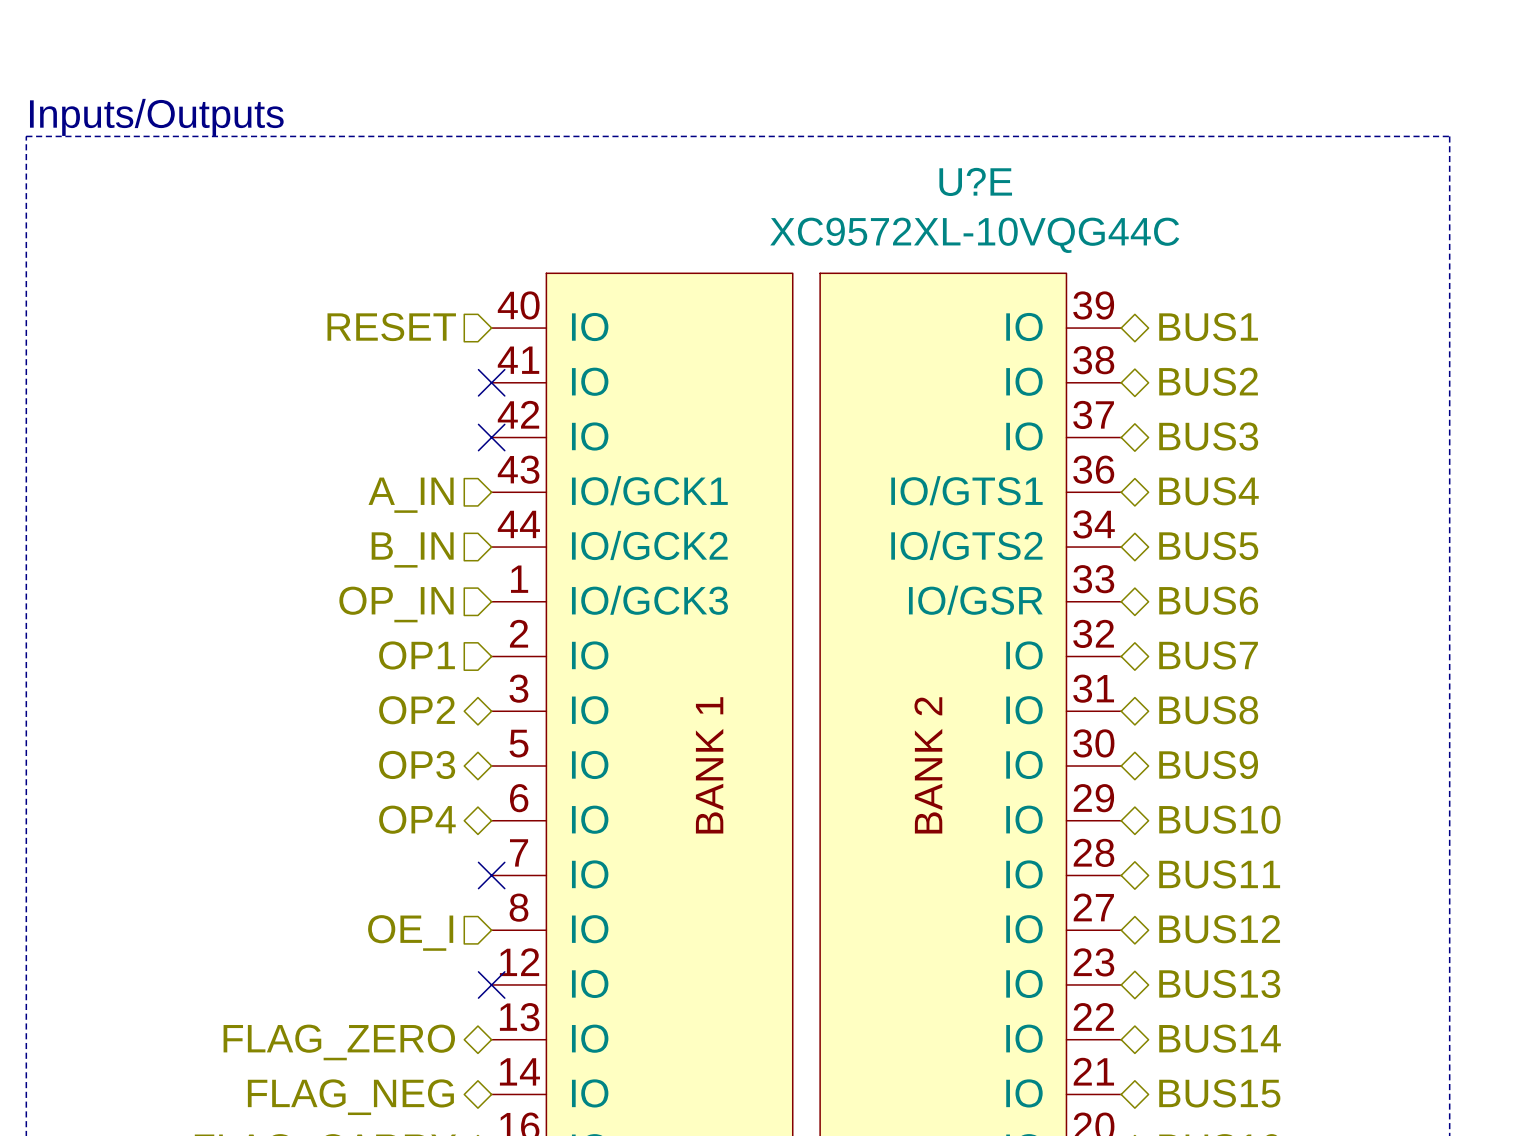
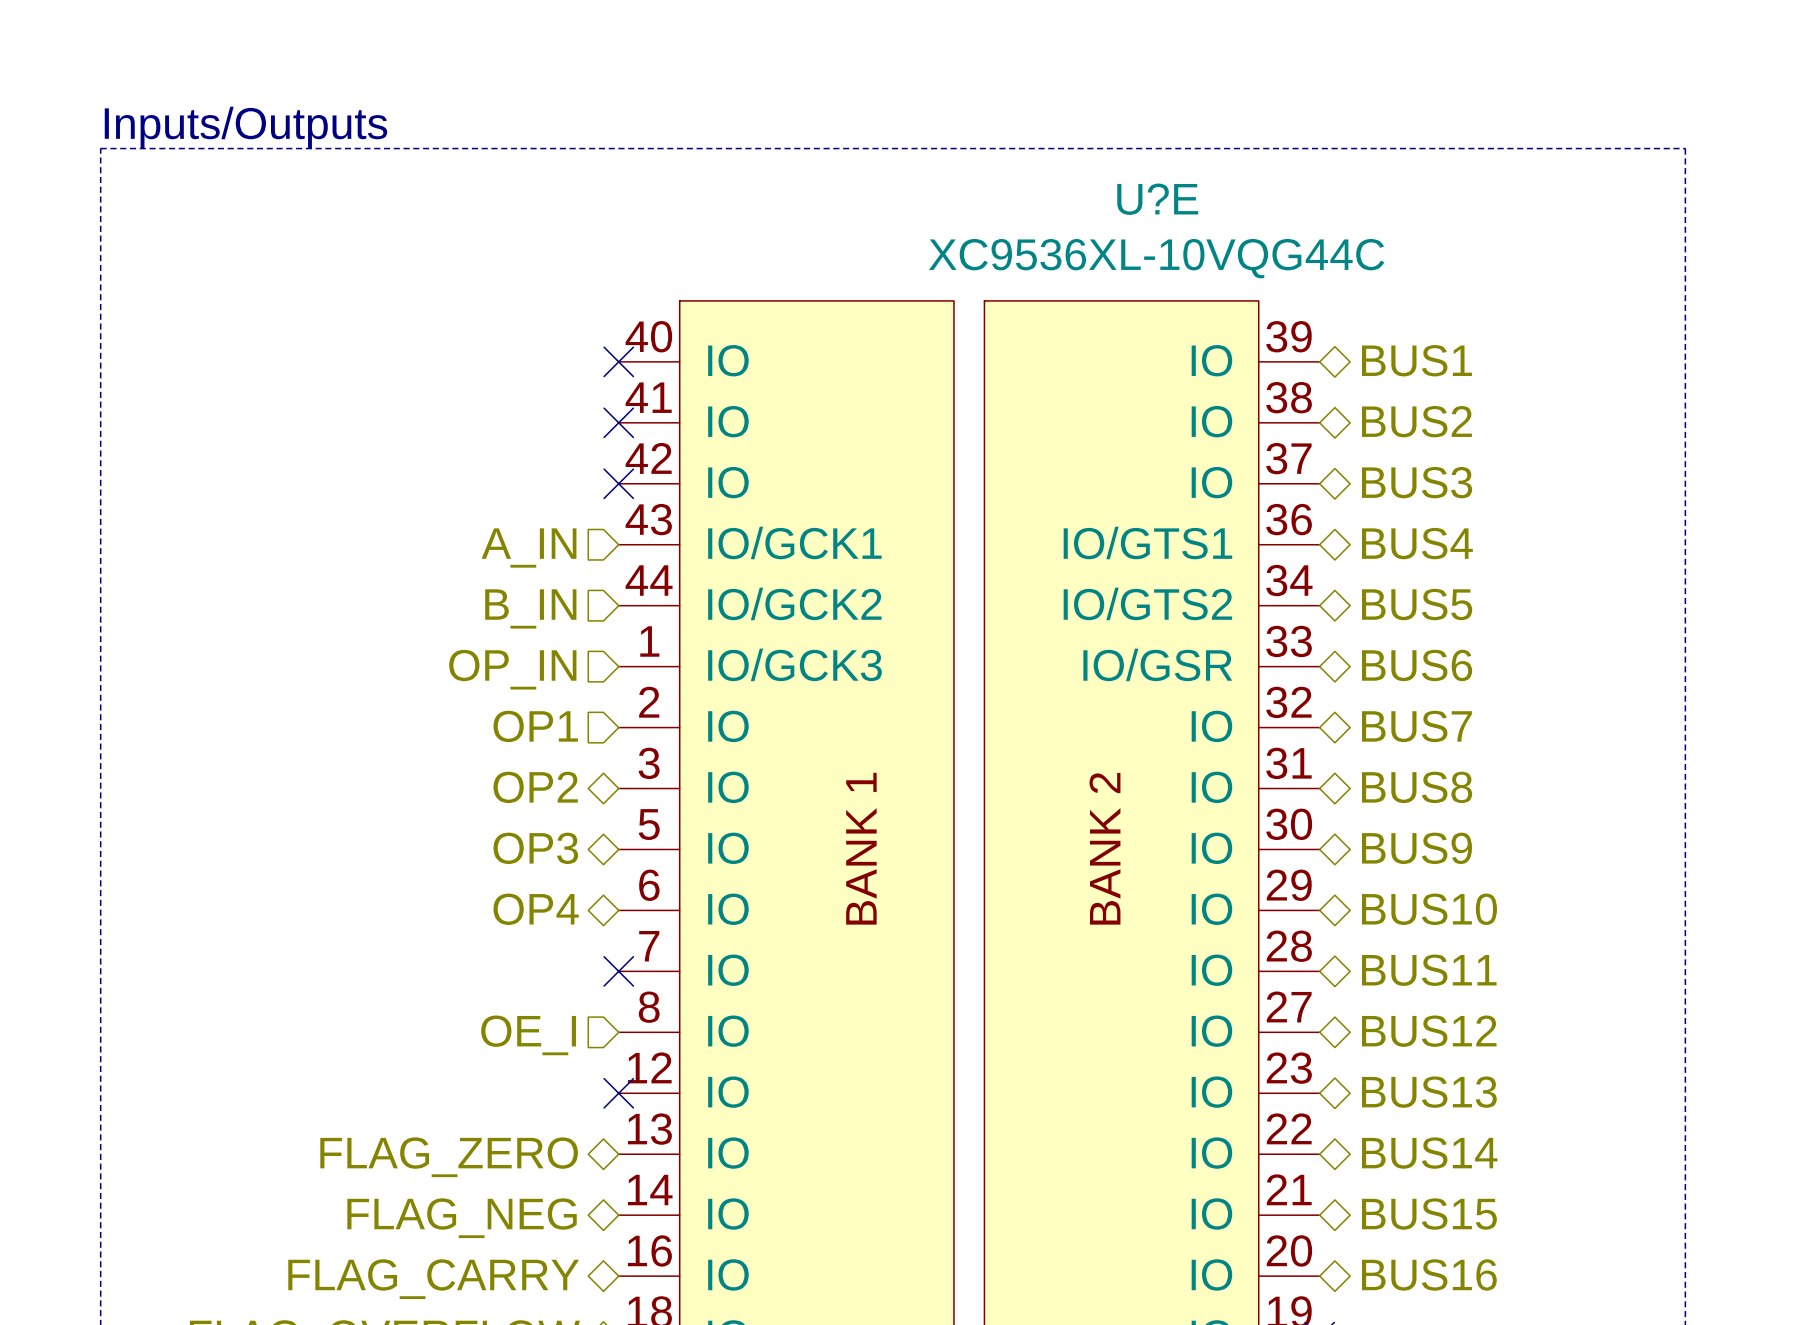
U?E value: XC9572XL-10VQG44C (974, 235) -> XC9536XL-10VQG44C (1156, 258)
hierarchical label: RESET (391, 327) -> none
no-connect mark: none -> (618, 361)

